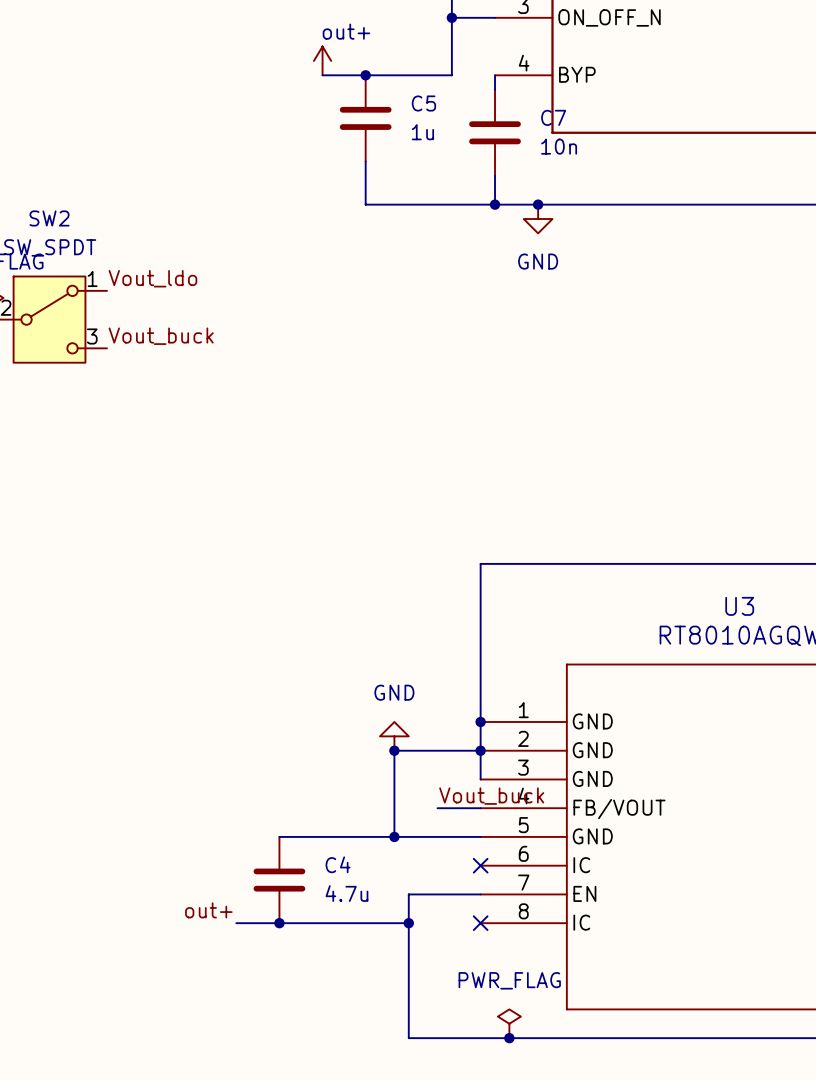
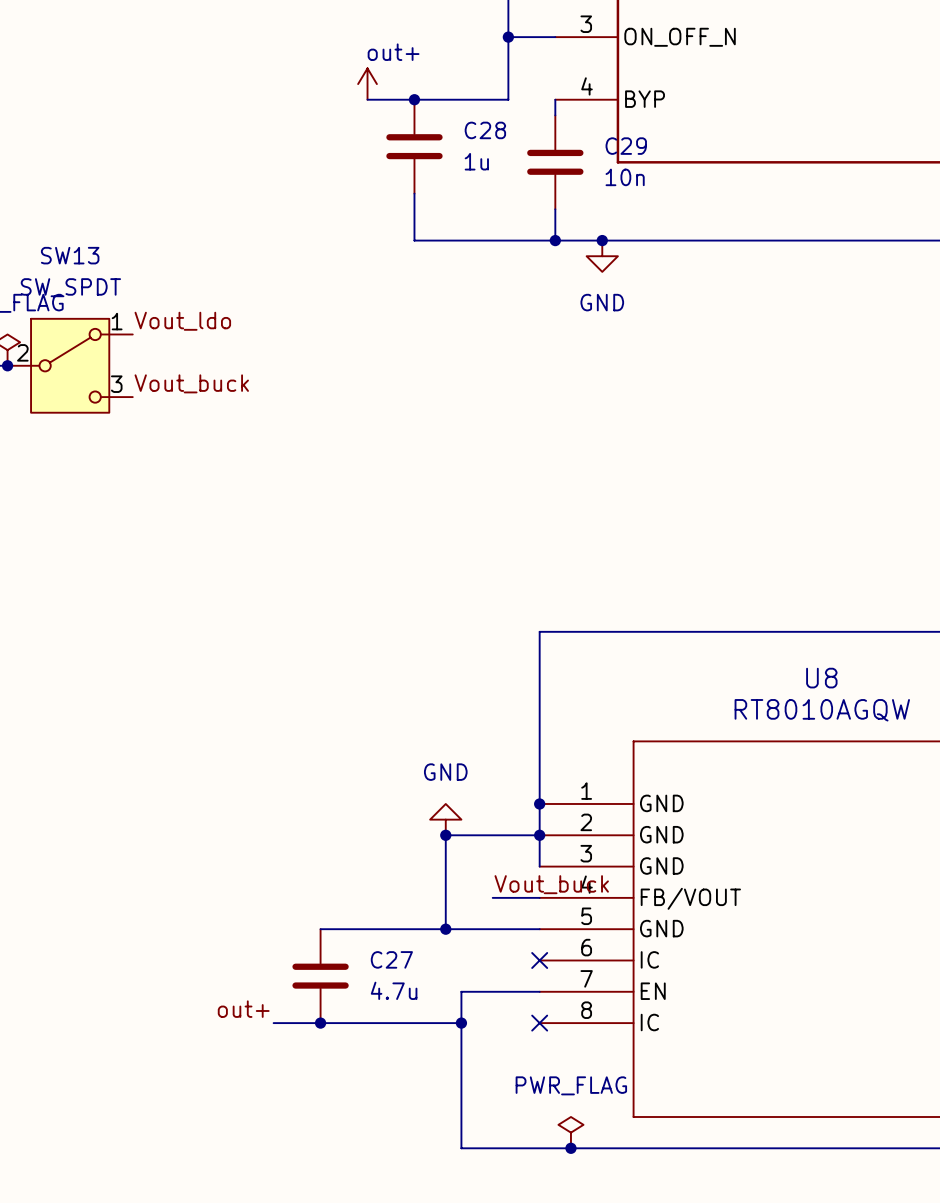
C5 name: C5 (423, 103) -> C28 (485, 130)
C7 name: C7 (553, 117) -> C29 (626, 146)
SW2 name: SW2 (49, 218) -> SW13 (70, 255)
U3 name: U3 (739, 606) -> U8 (821, 678)
C4 name: C4 (338, 864) -> C27 (391, 959)

